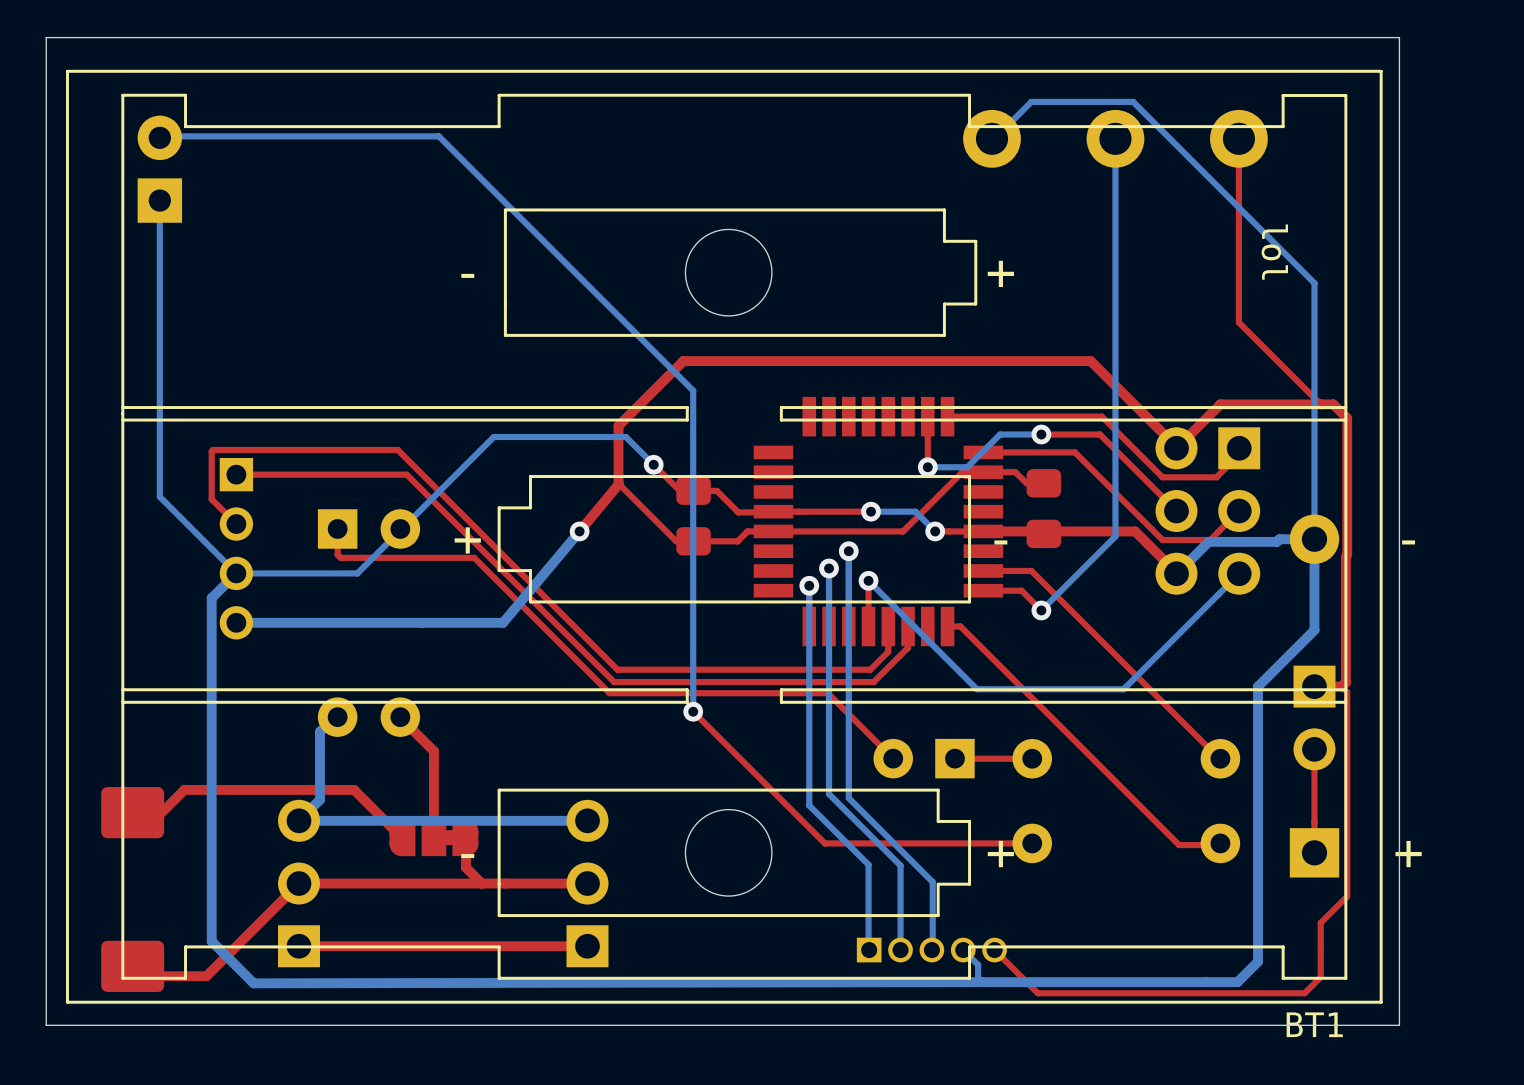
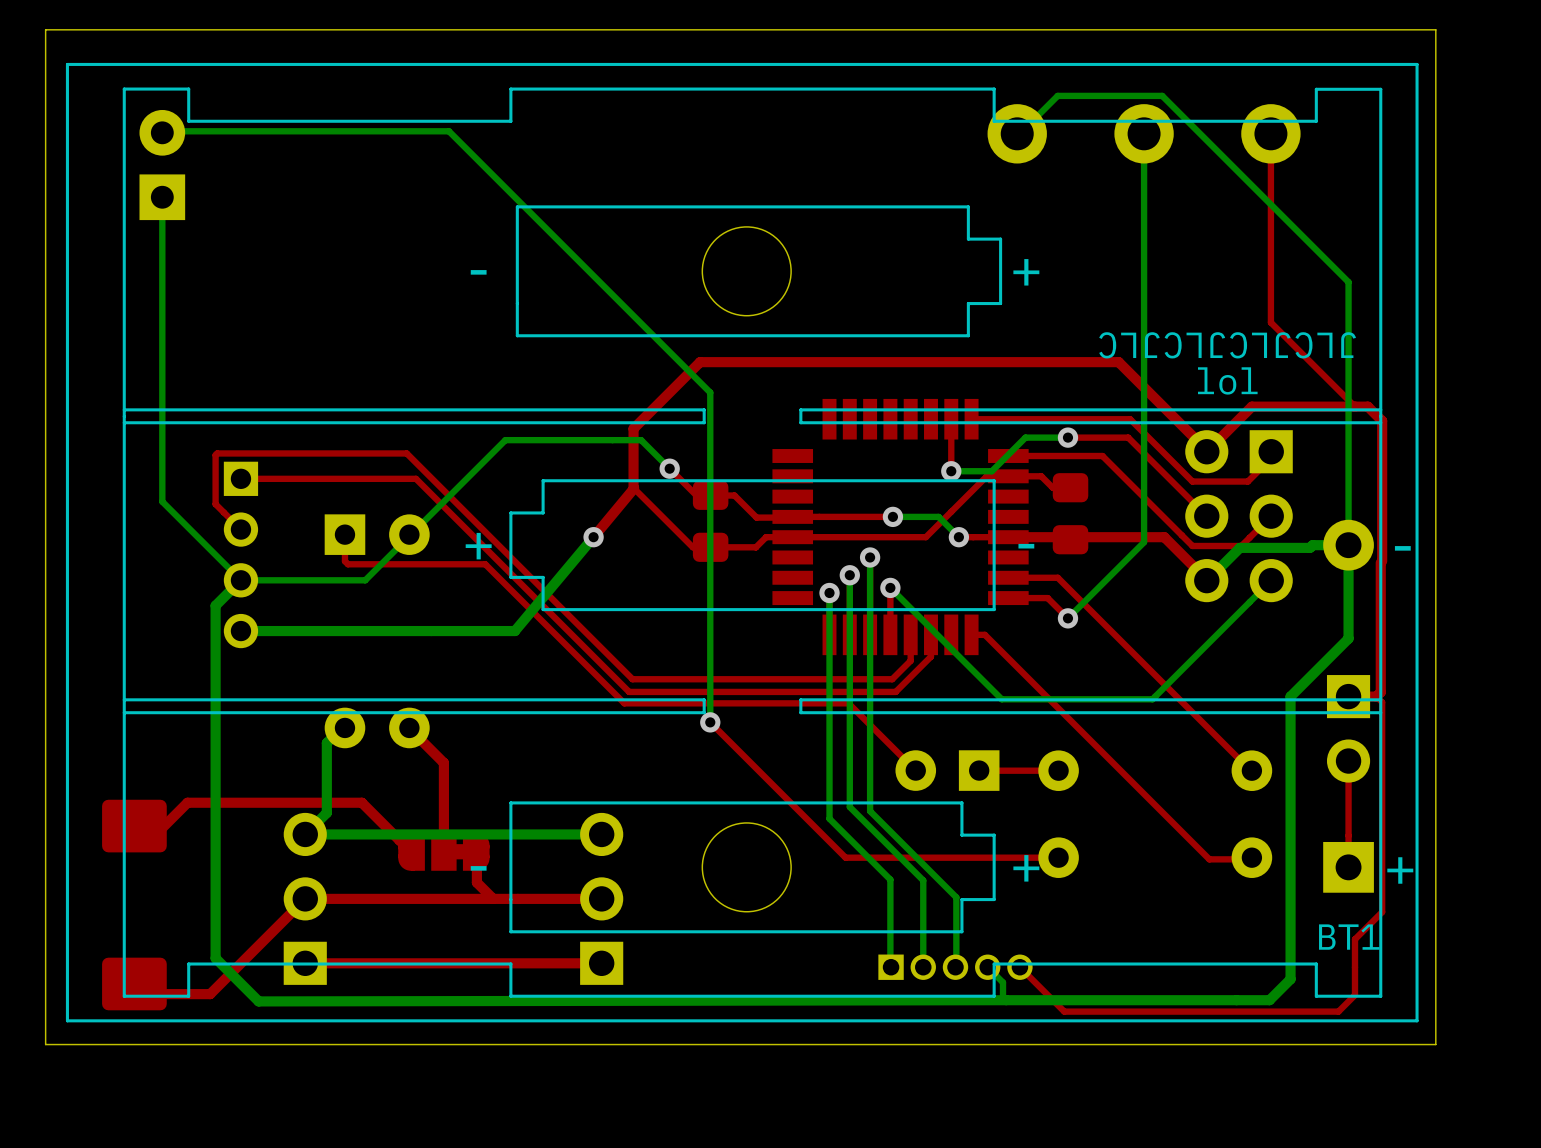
text rotation: 0° (1274, 252) -> 90° counterclockwise (1227, 380)
text position: lol (1274, 252) -> lol (1227, 380)
text: none -> JLCJLCJLCJLC (1227, 345)
BT1 text position: - (1408, 542) -> - (1402, 548)
BT1 text position: + (1408, 854) -> + (1400, 870)
BT1 name position: BT1 (1314, 1024) -> BT1 (1349, 937)

